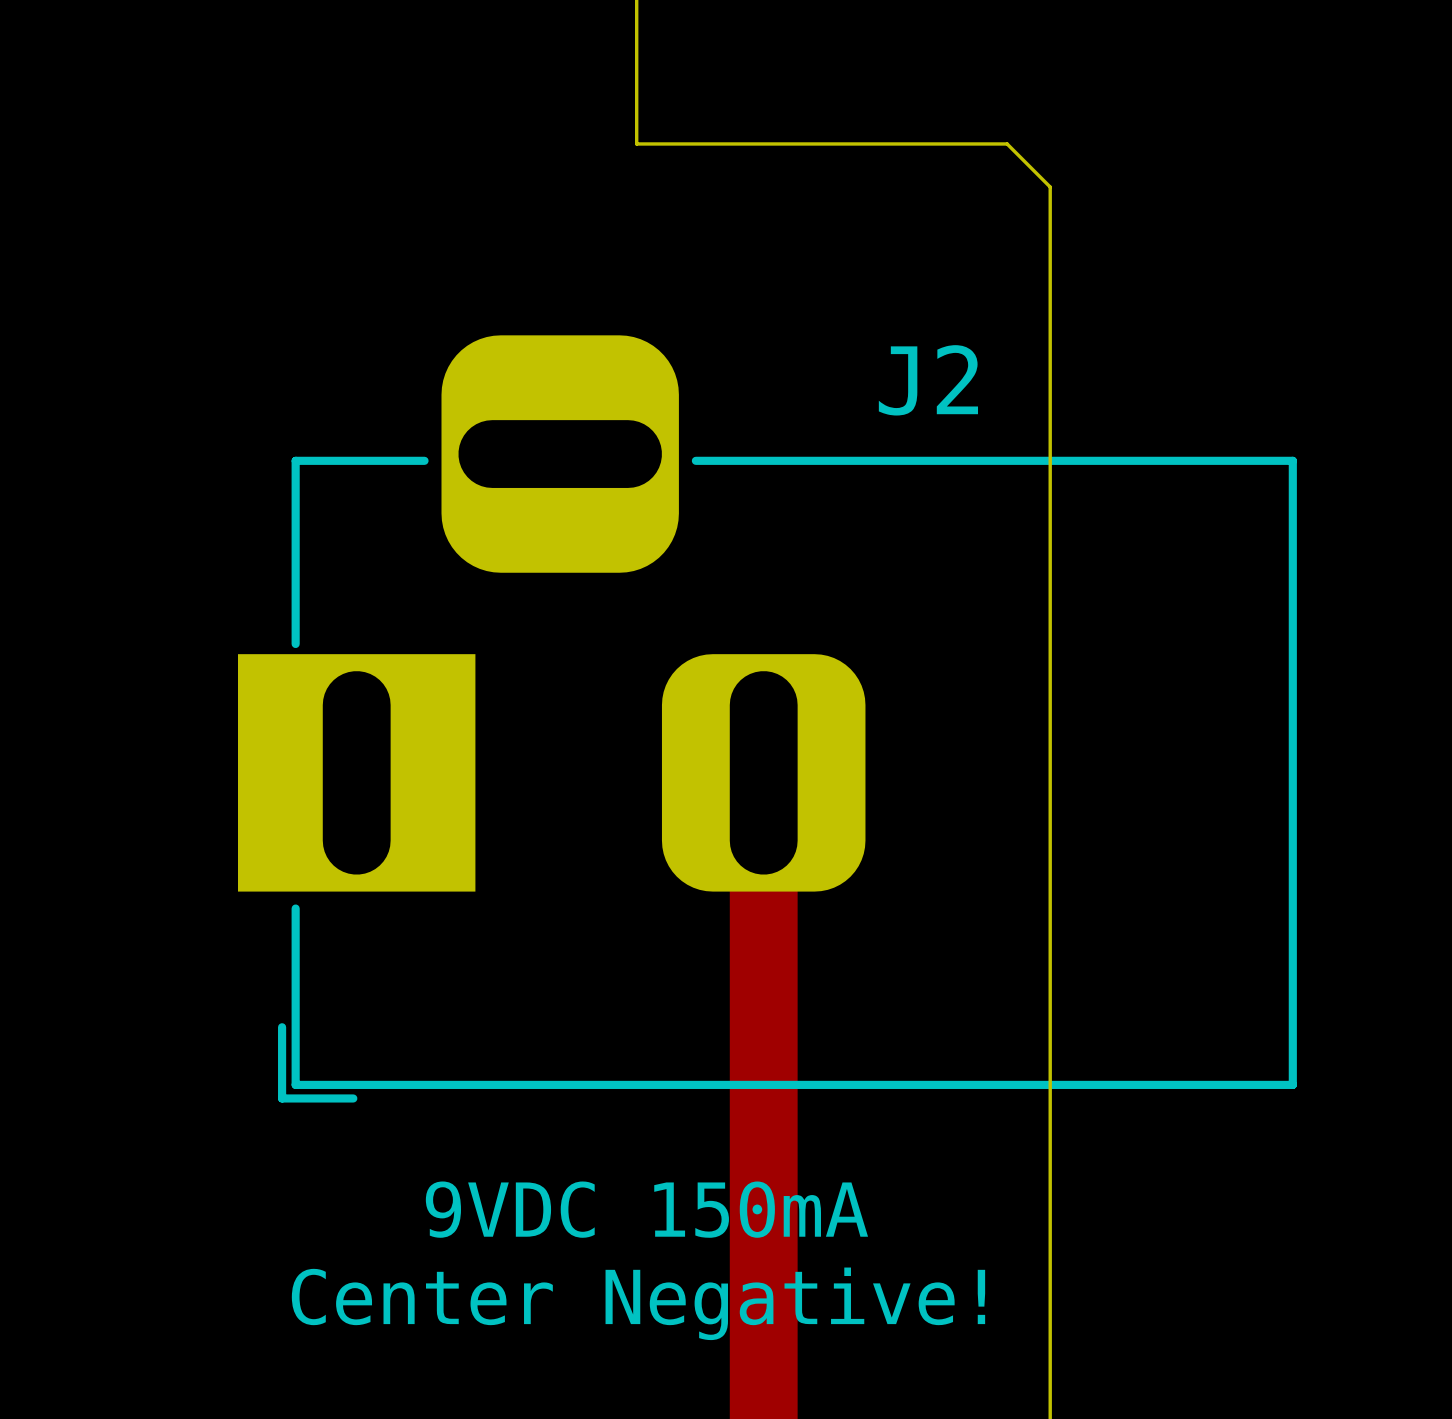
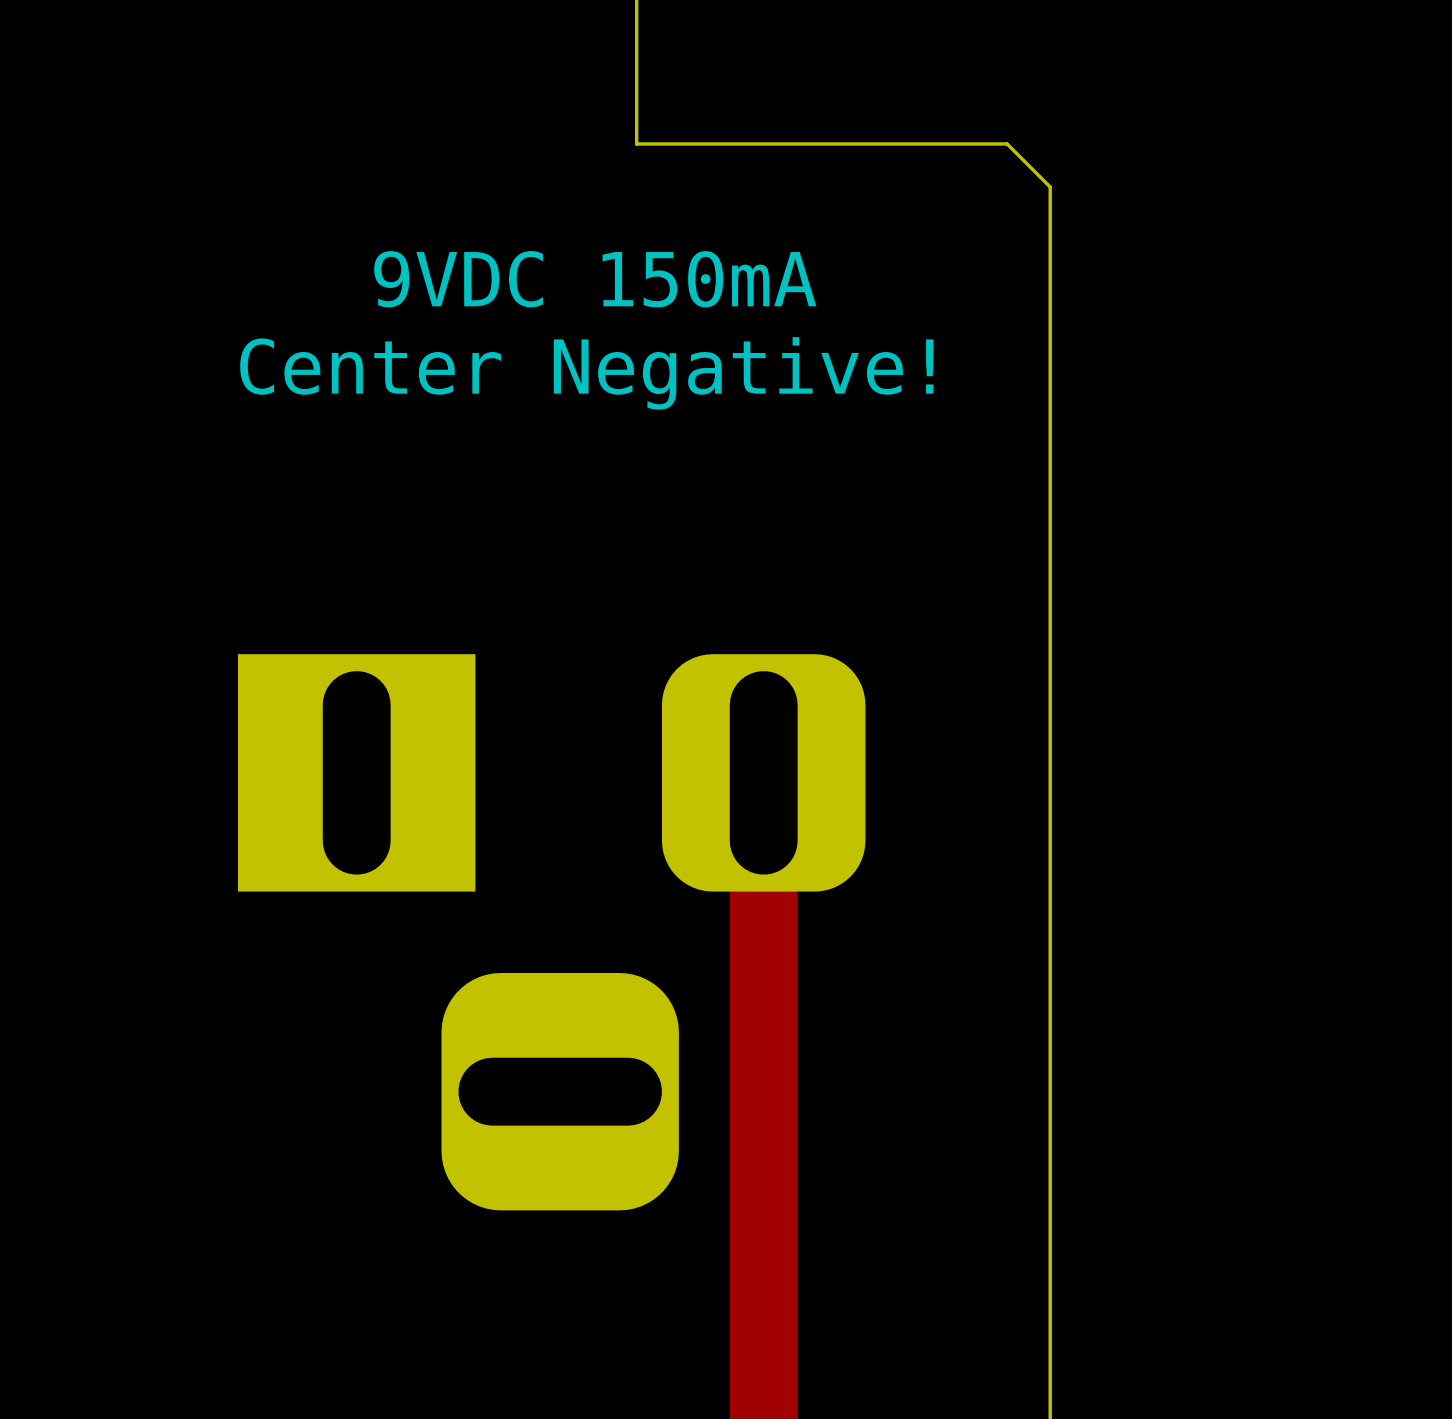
J2 side: top (767, 718) -> bottom (551, 932)
text position: 9VDC 150mA (646, 1209) -> 9VDC 150mA (595, 279)
text position: Center Negative! (638, 1303) -> Center Negative! (586, 373)

